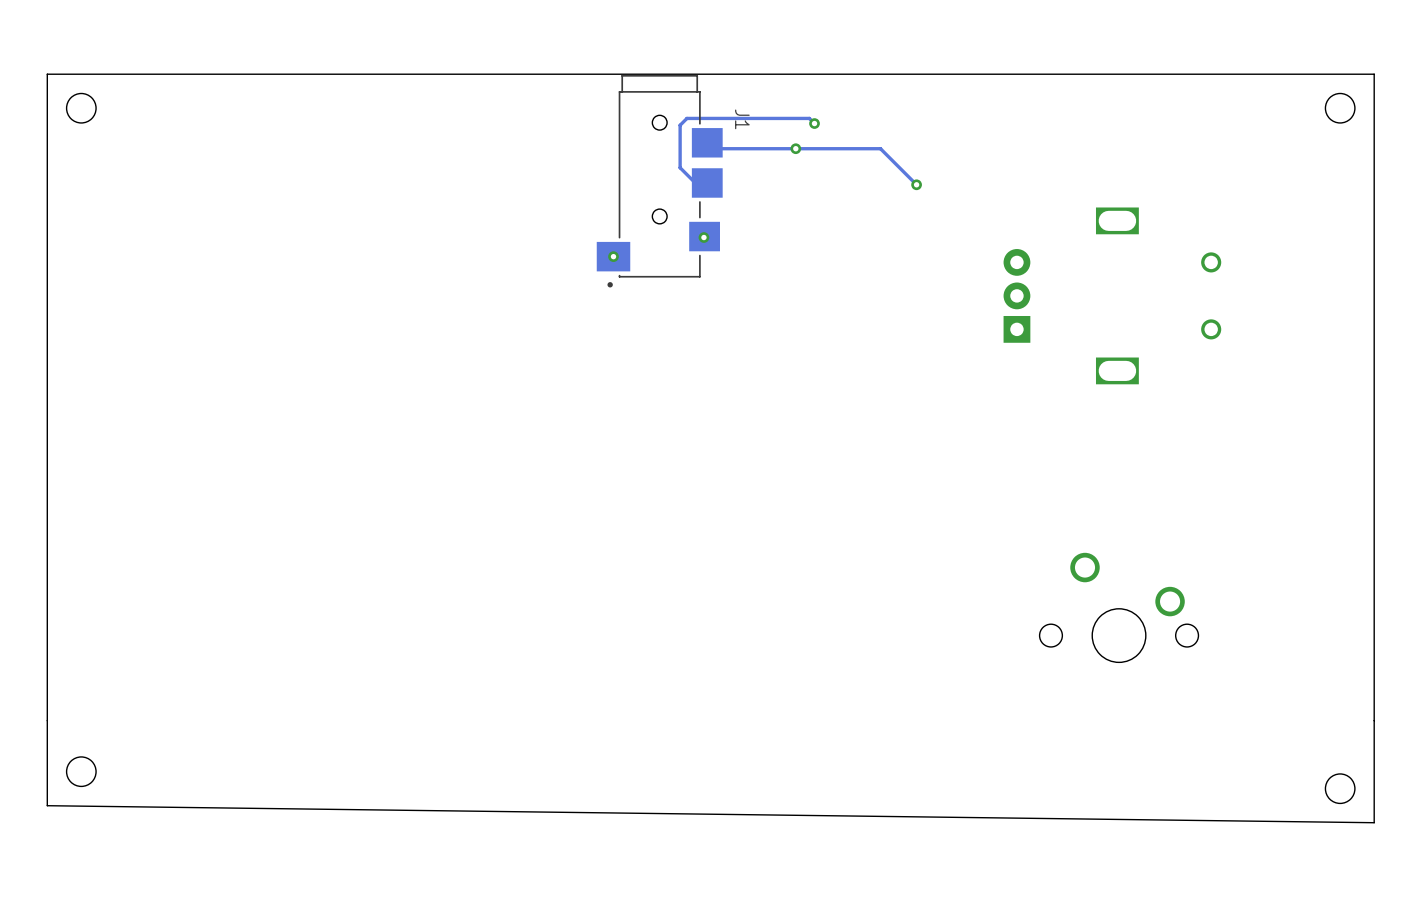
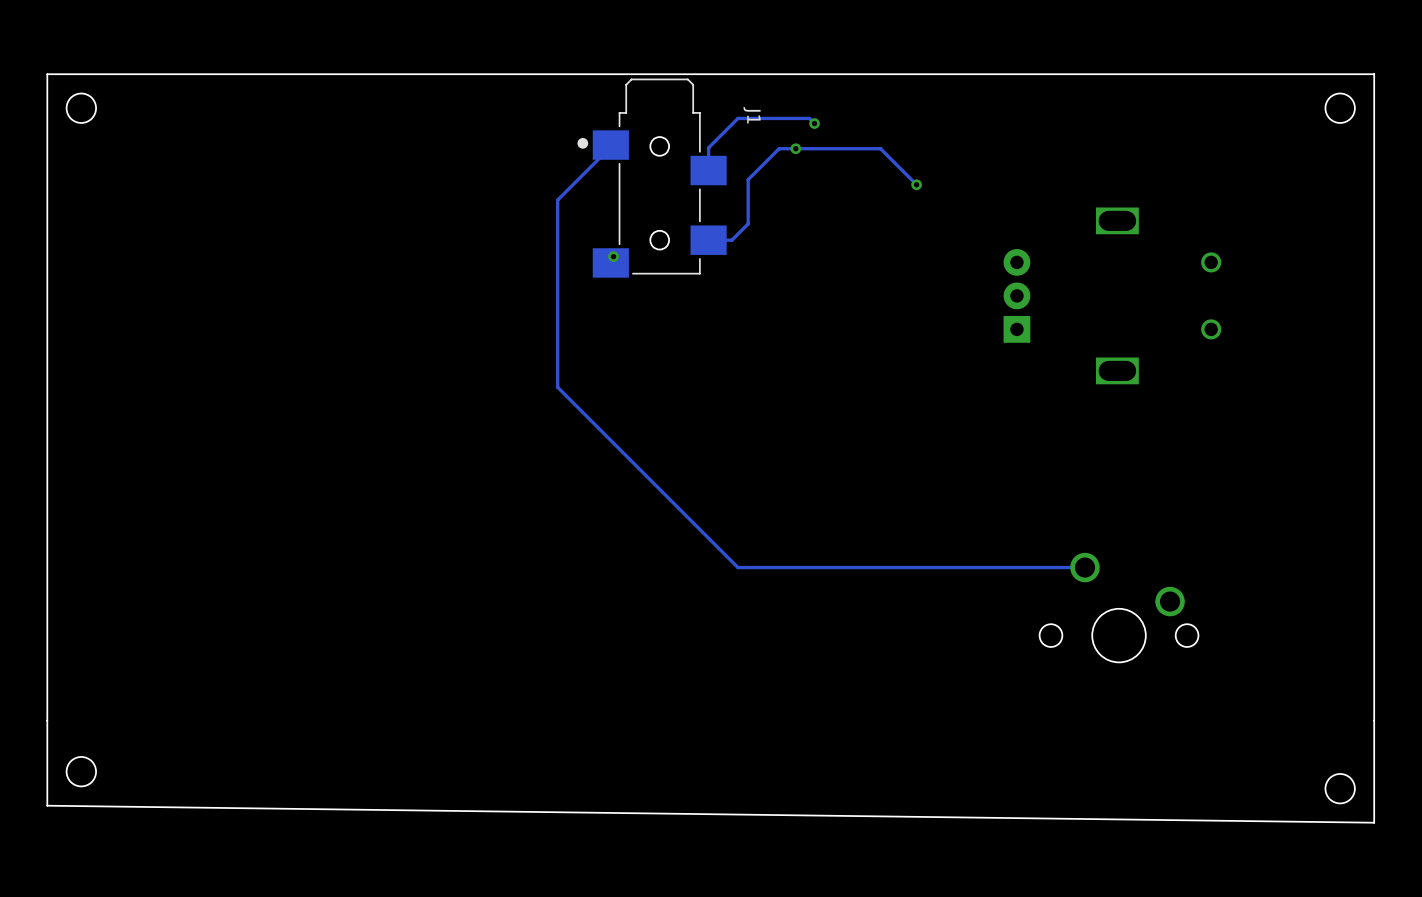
J1 footprint: [596, 74, 723, 288] -> [577, 78, 727, 278]
track: (737, 118) (686, 118) (680, 125) (680, 167) (695, 182) -> (737, 118) (708, 147) (708, 170)
track: (707, 142) (713, 148) (779, 148) -> (708, 240) (731, 240) (748, 223) (748, 179) (779, 148)
track: none -> (610, 145) (557, 200) (557, 387) (737, 567) (1085, 567)
via: (703, 237) -> none

